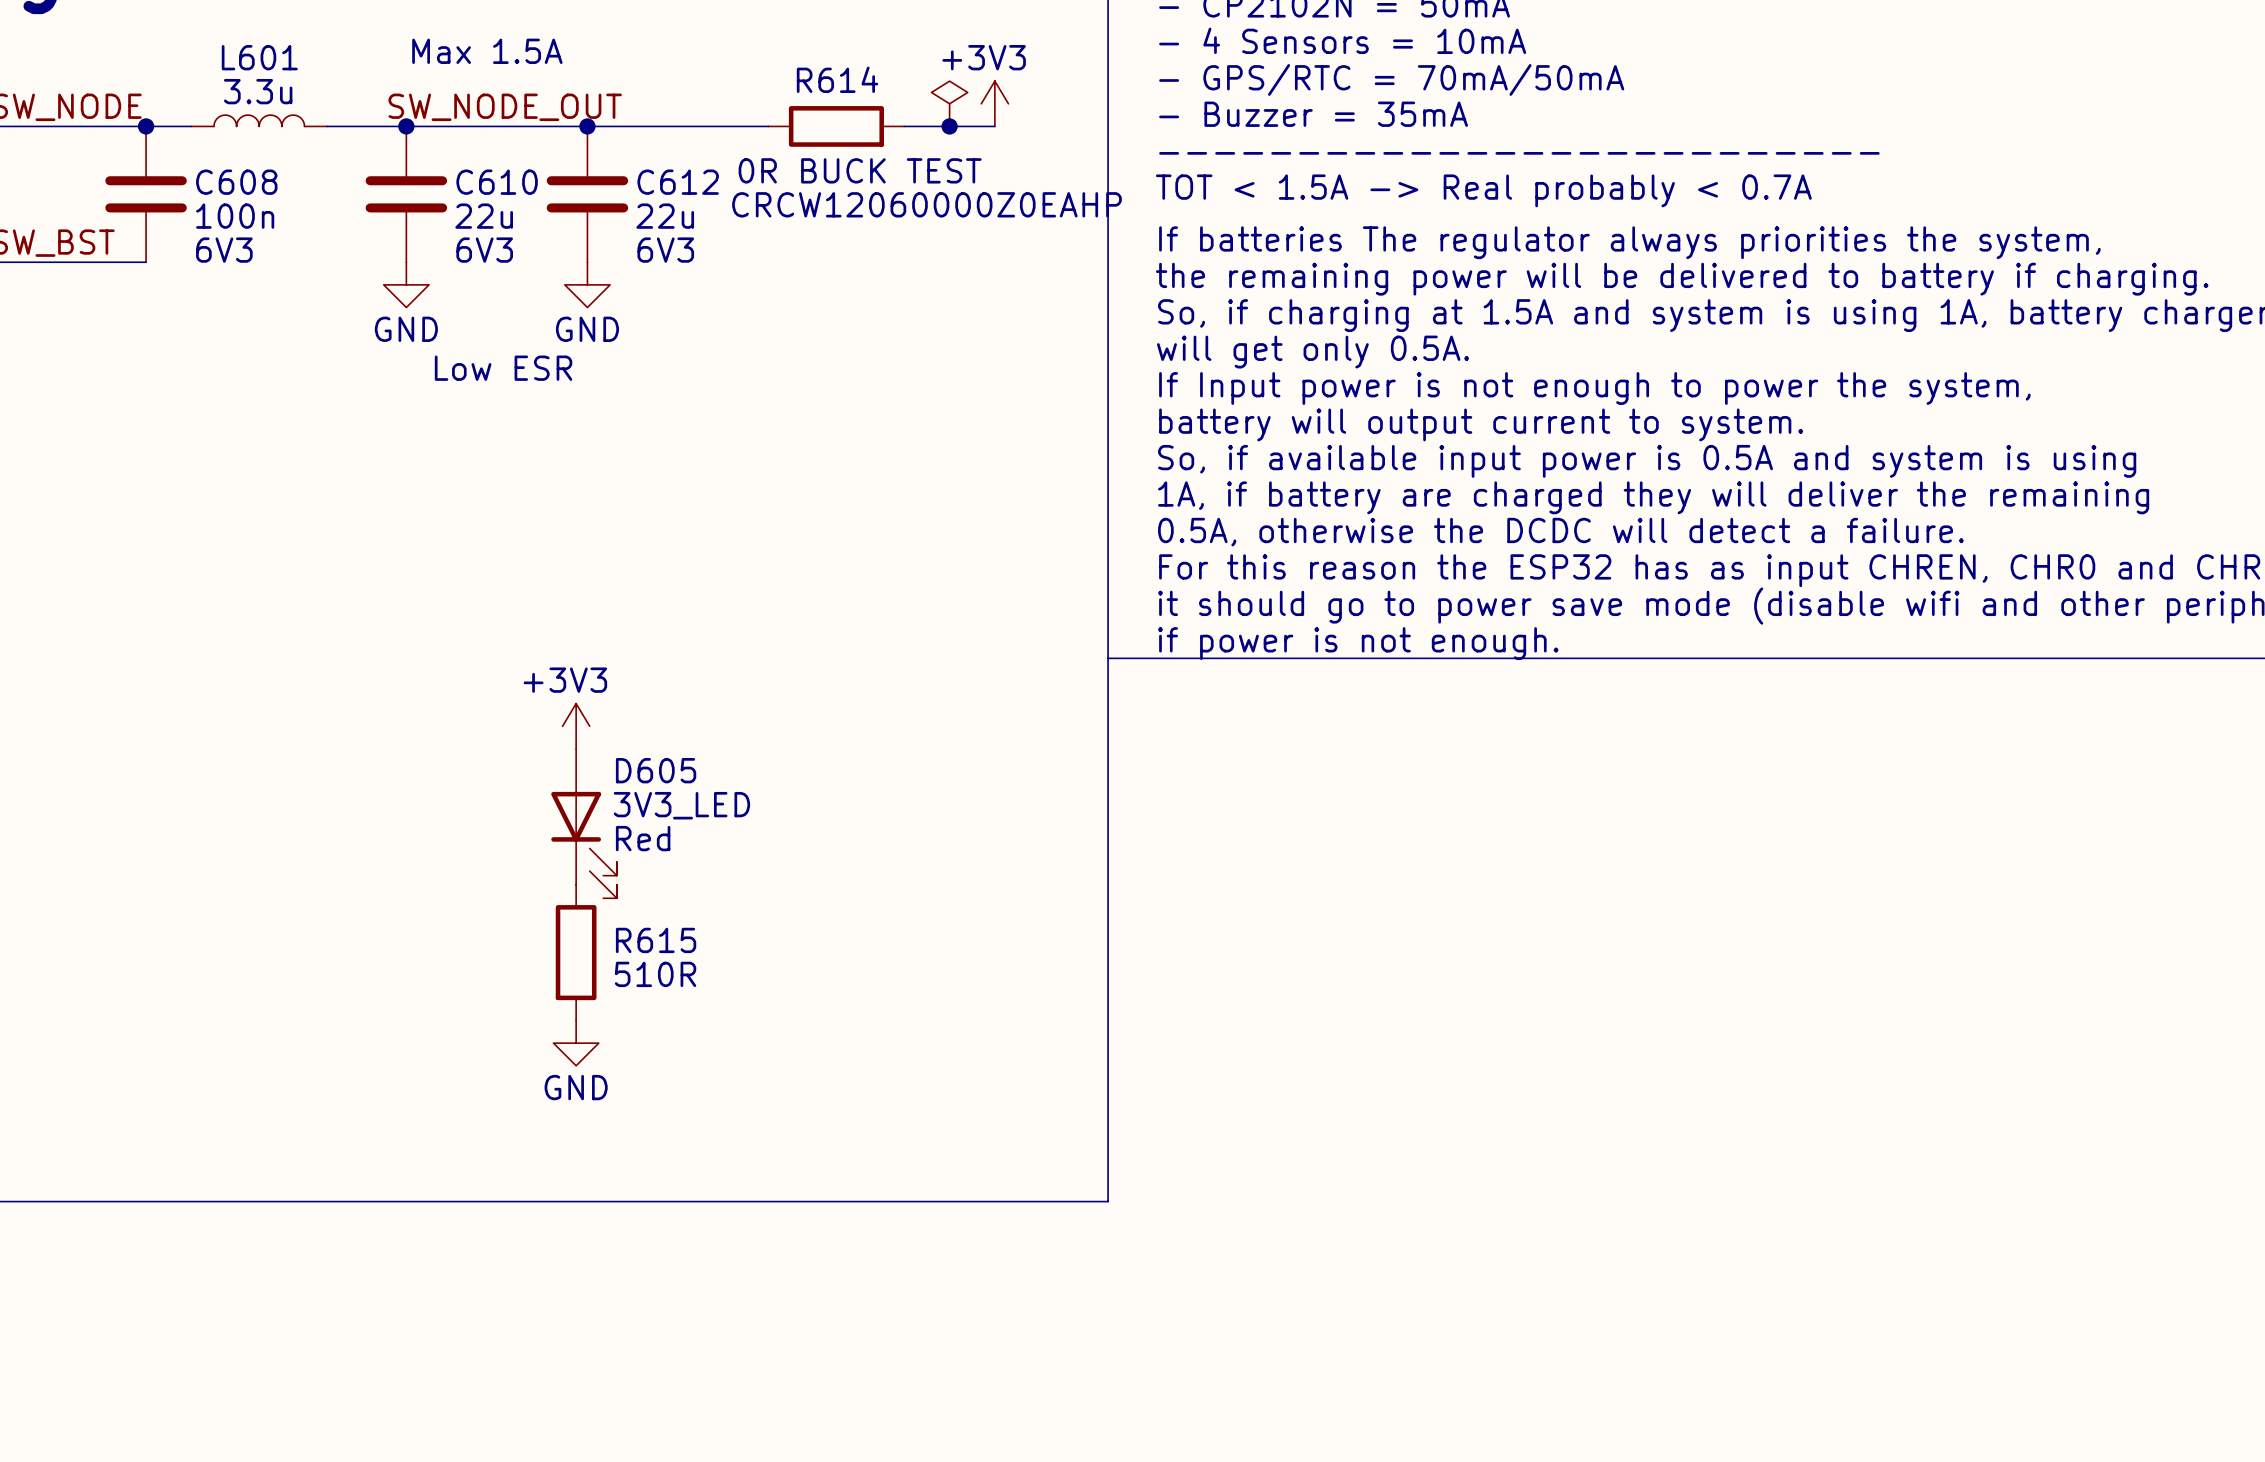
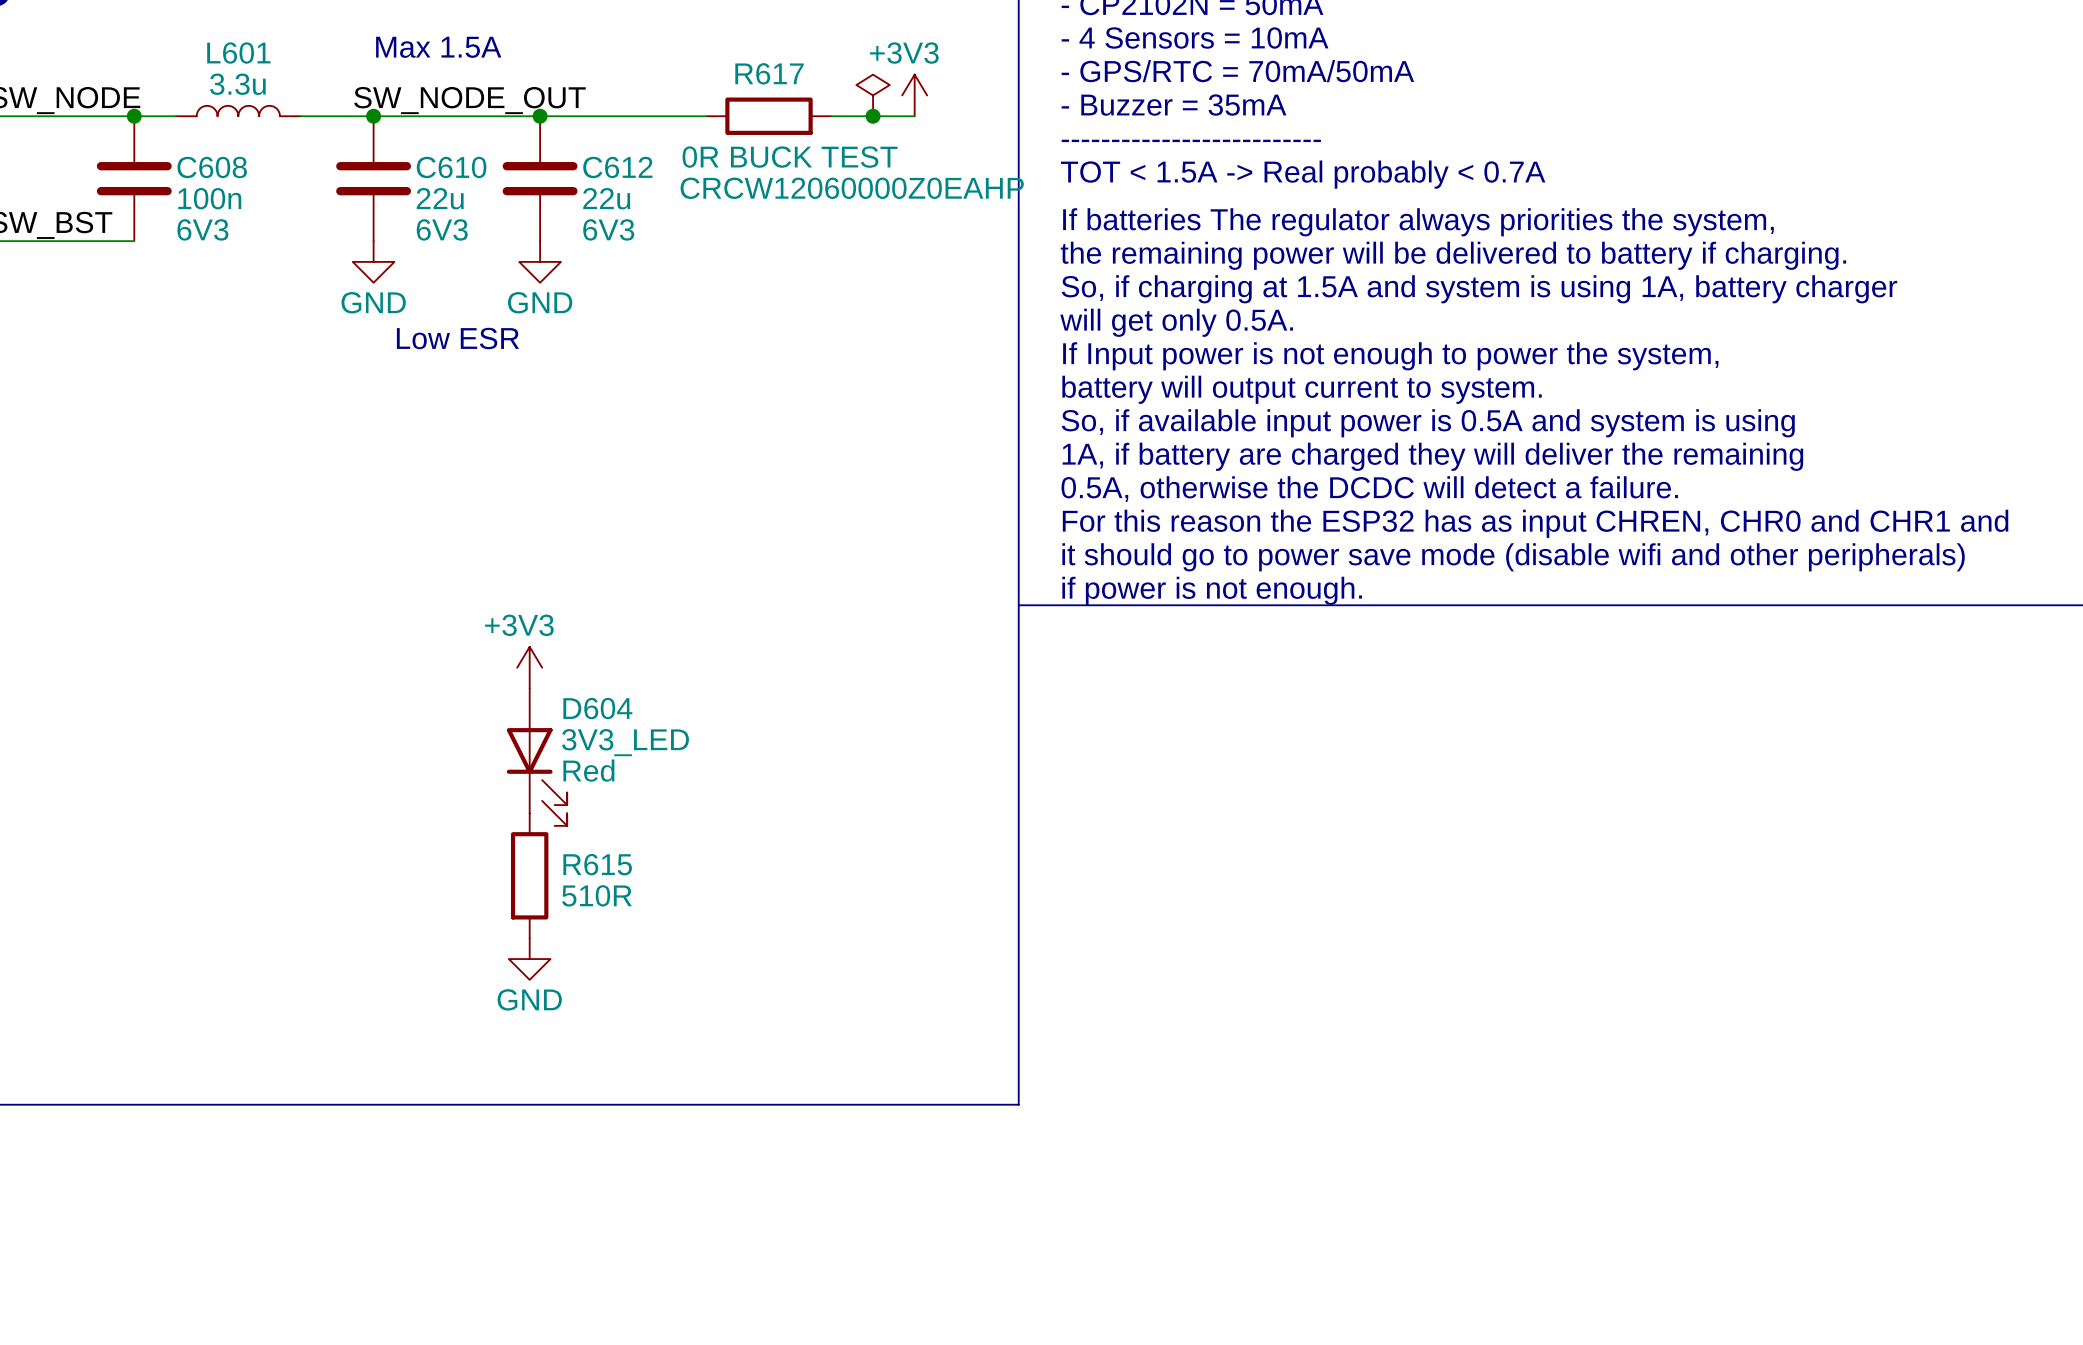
R614 name: R614 (837, 79) -> R617 (769, 73)
D605 name: D605 (656, 770) -> D604 (597, 708)

